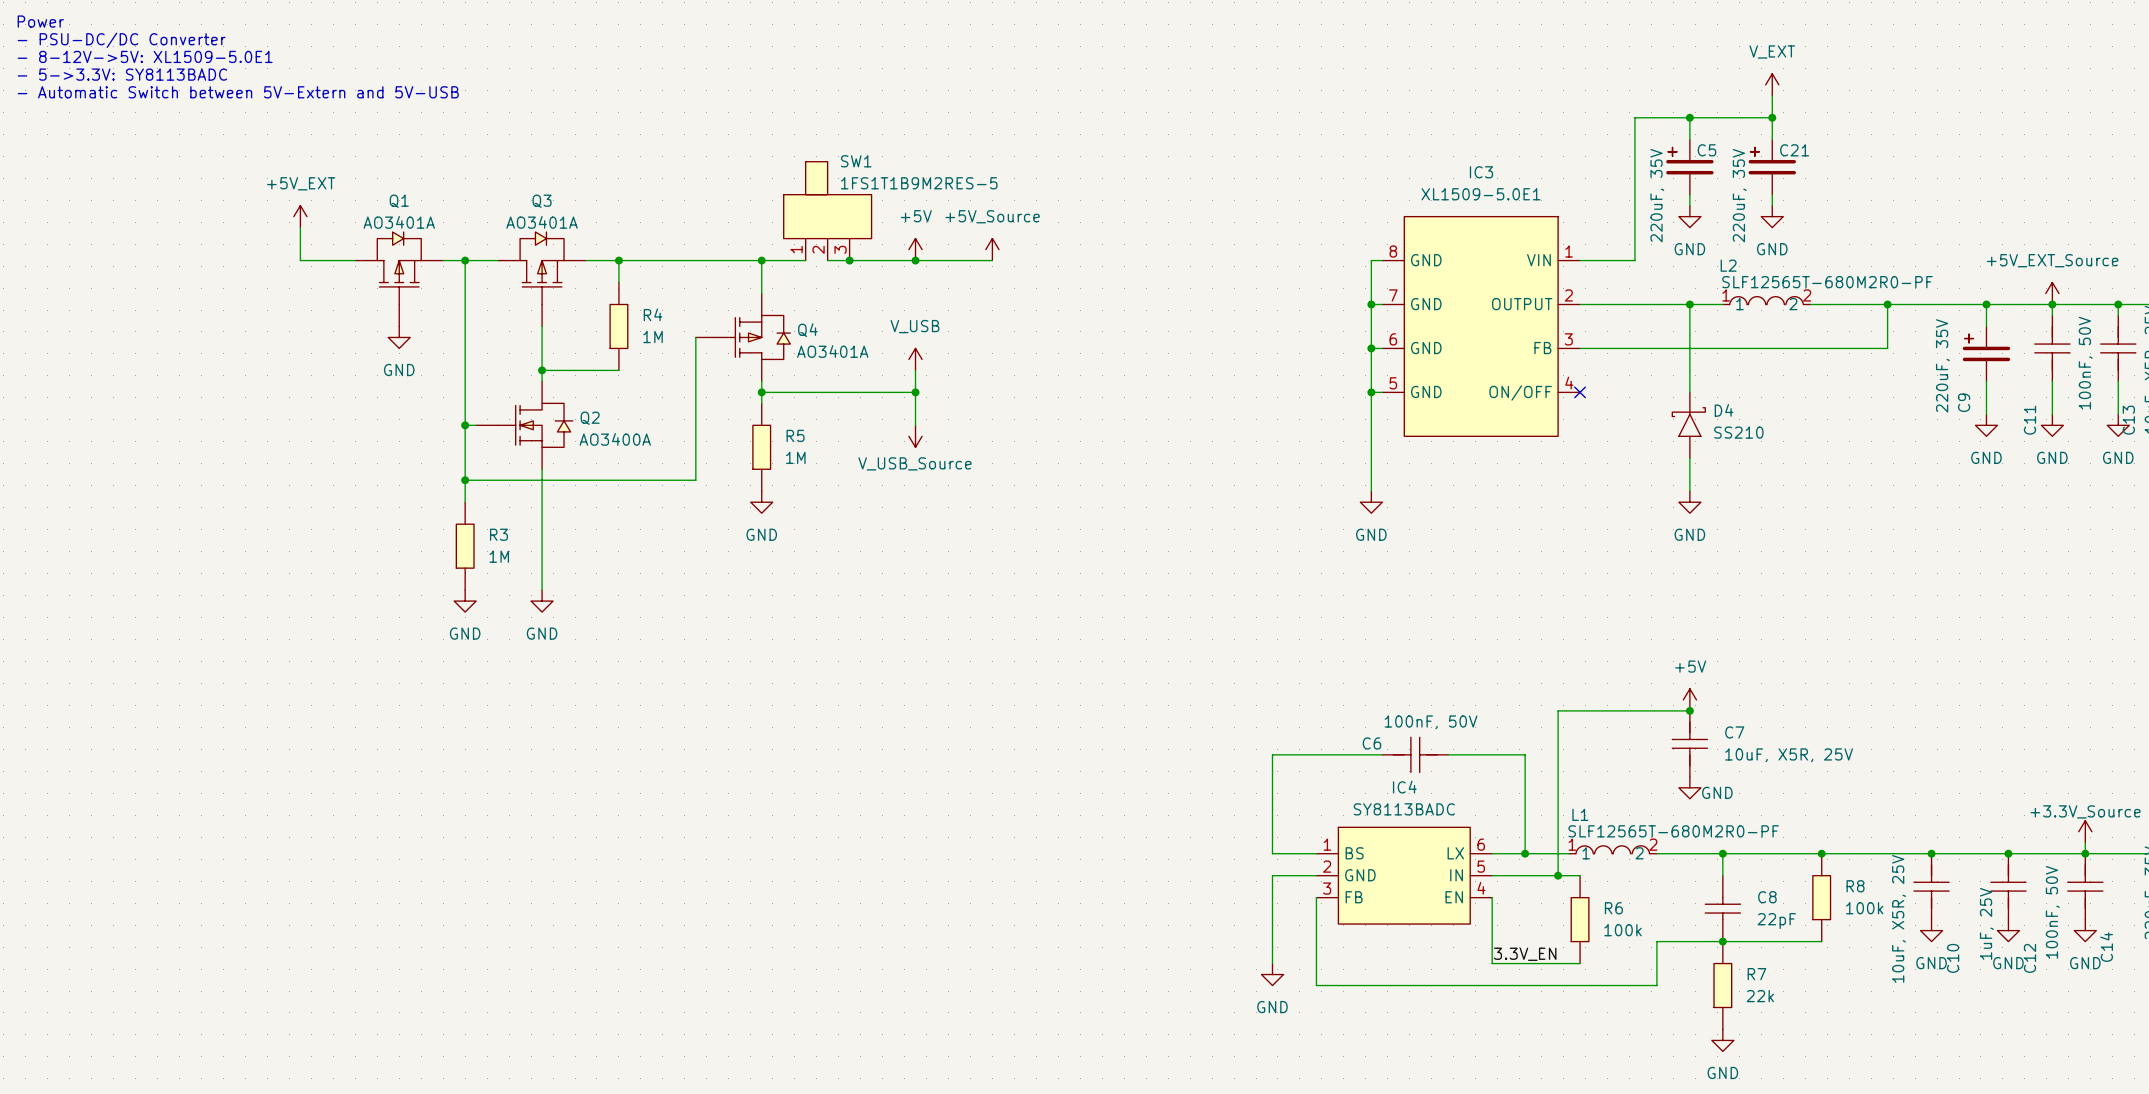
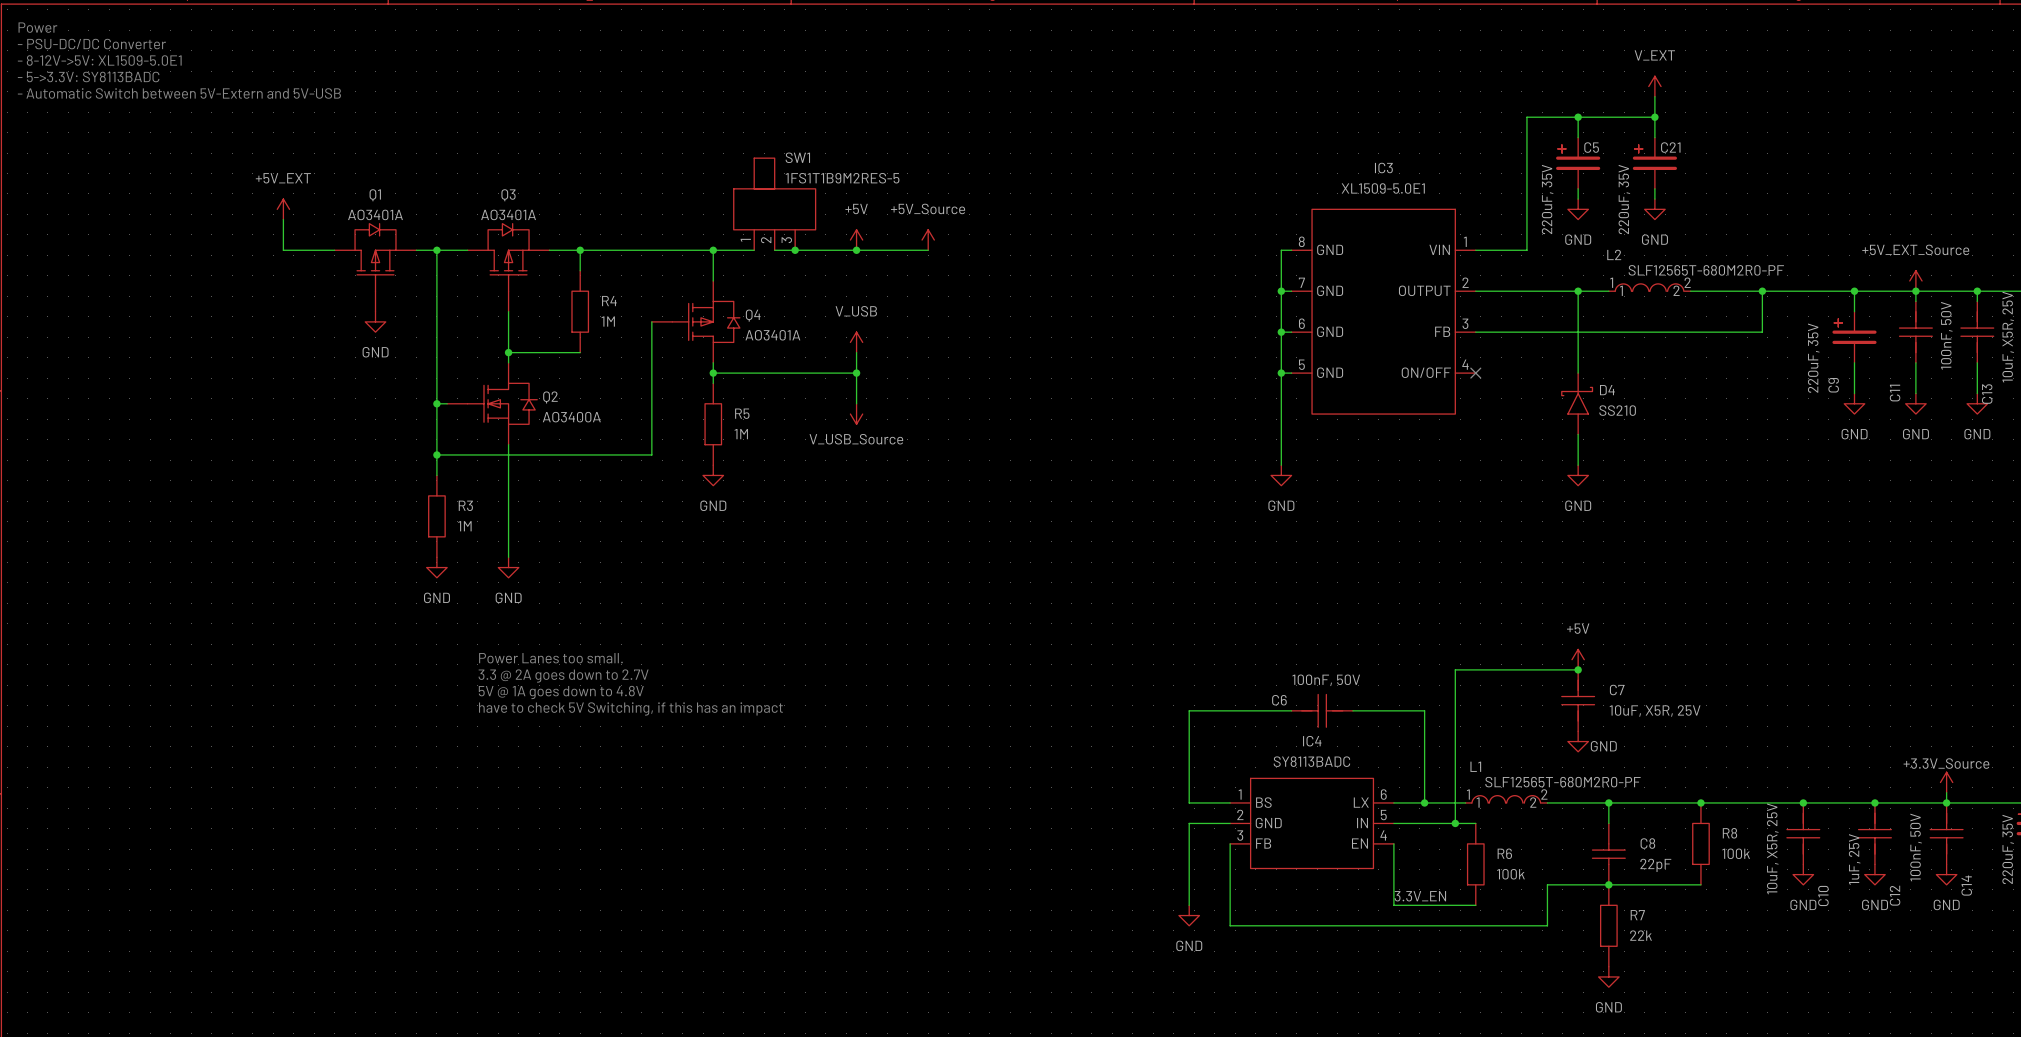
text: none -> Power Lanes too small. (550, 658)
text: none -> 3.3 @ 2A goes down to 2.7V (563, 676)
text: none -> 5V @ 1A goes down to 4.8V (561, 692)
text: none -> have to check 5V Switching, if this has an impact (630, 708)

